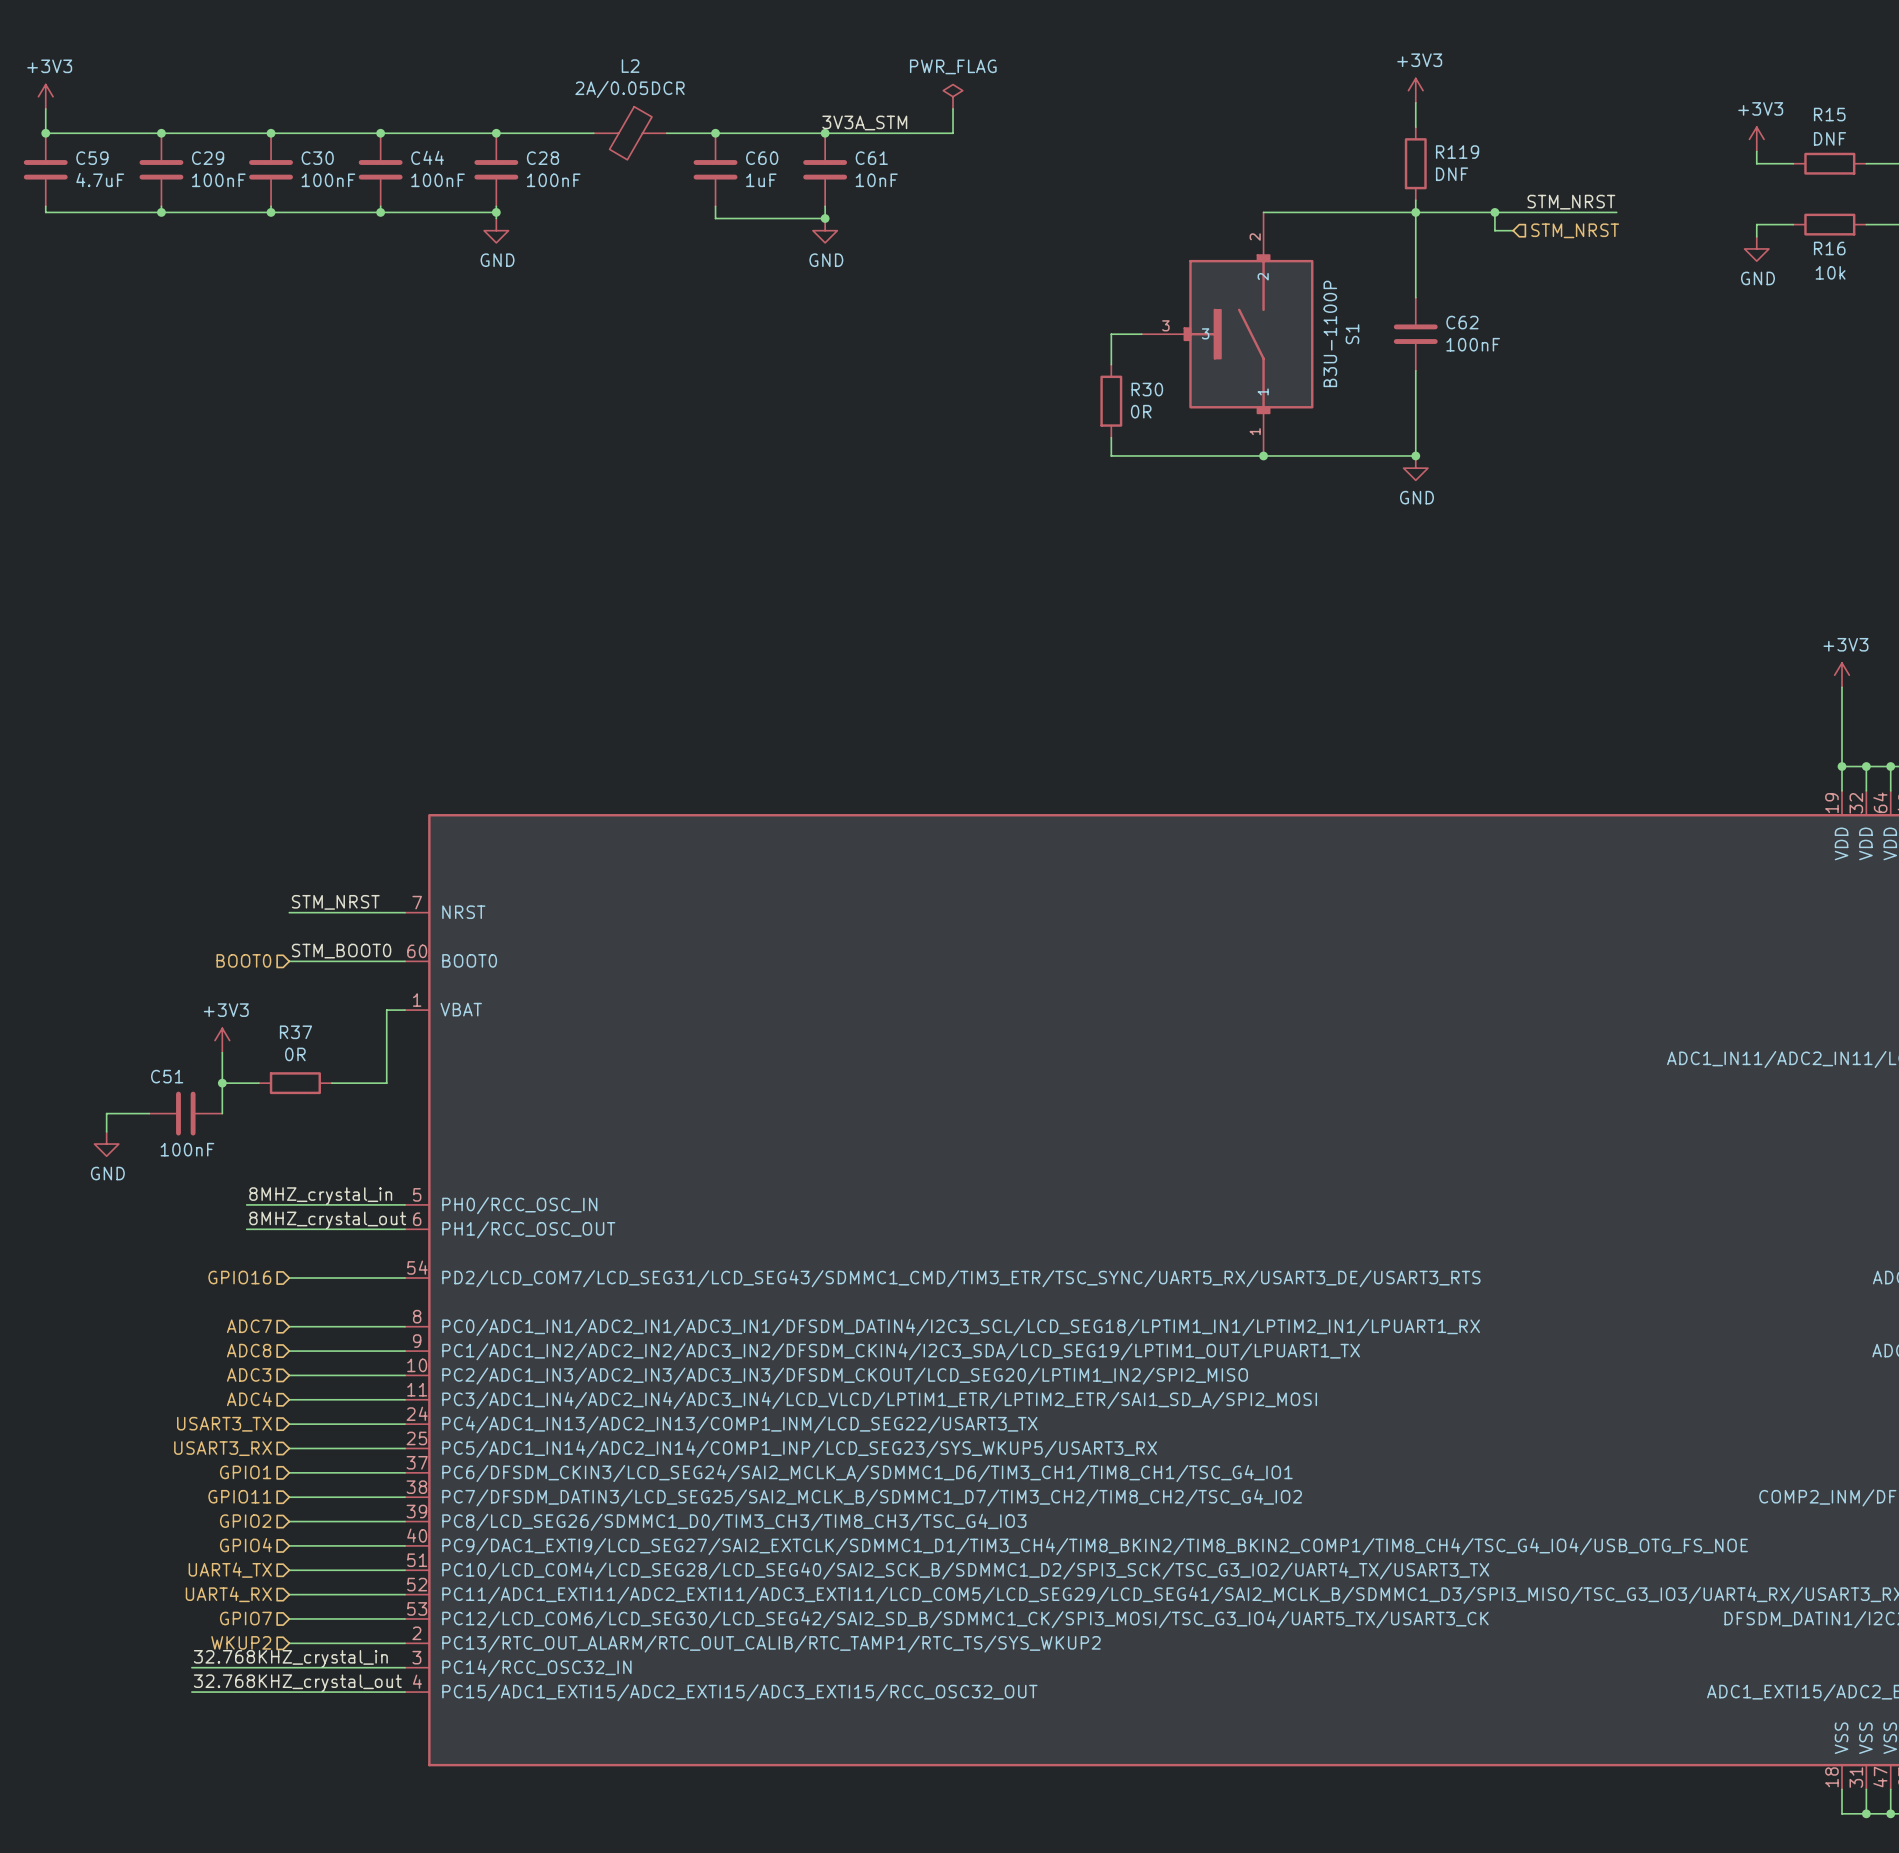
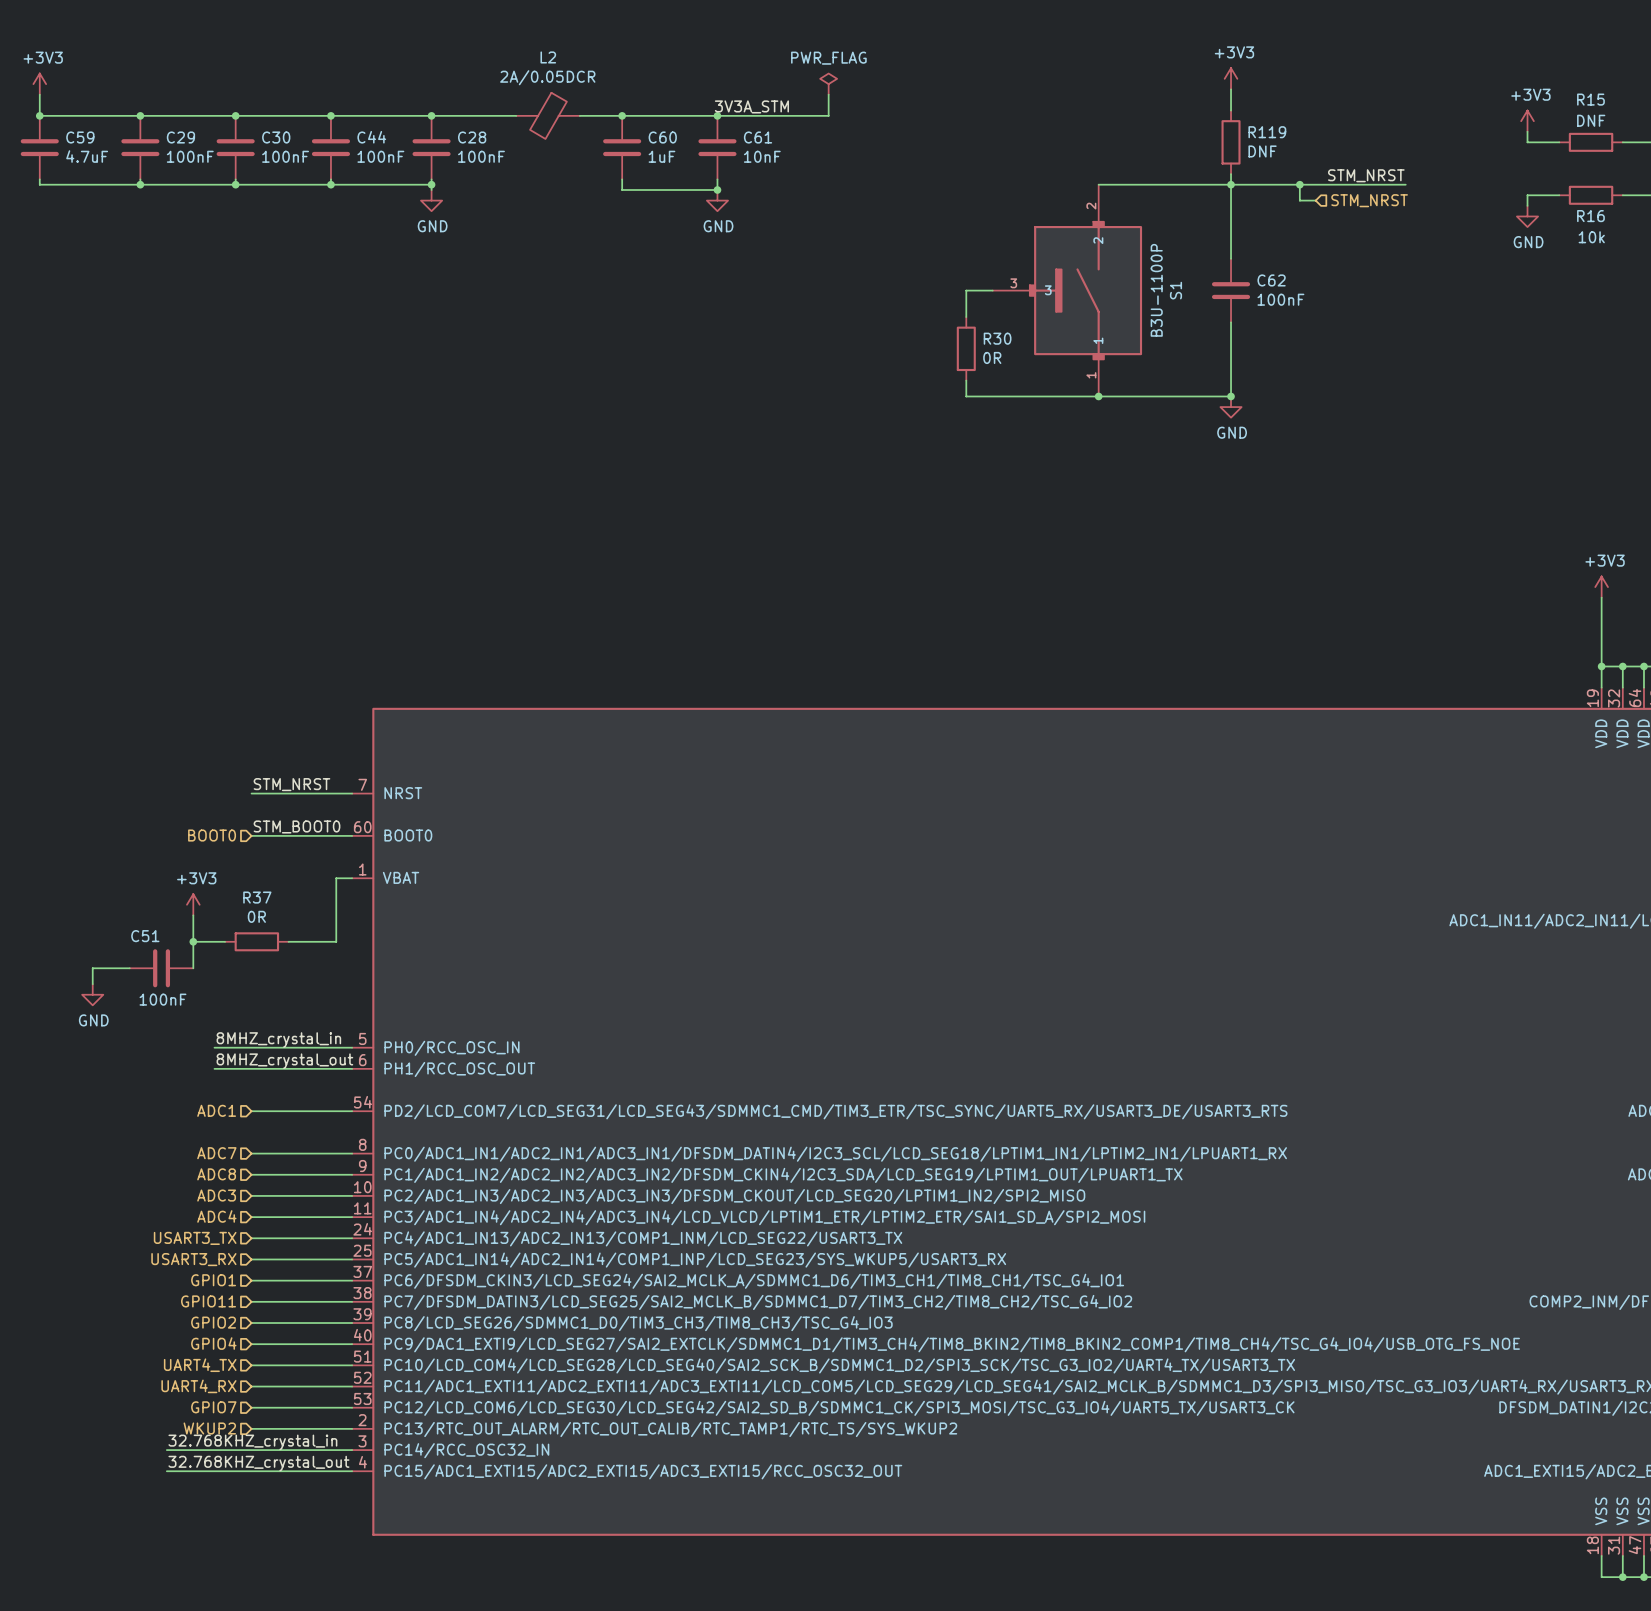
hierarchical label: GPIO16 (239, 1277) -> ADC1 (216, 1110)

